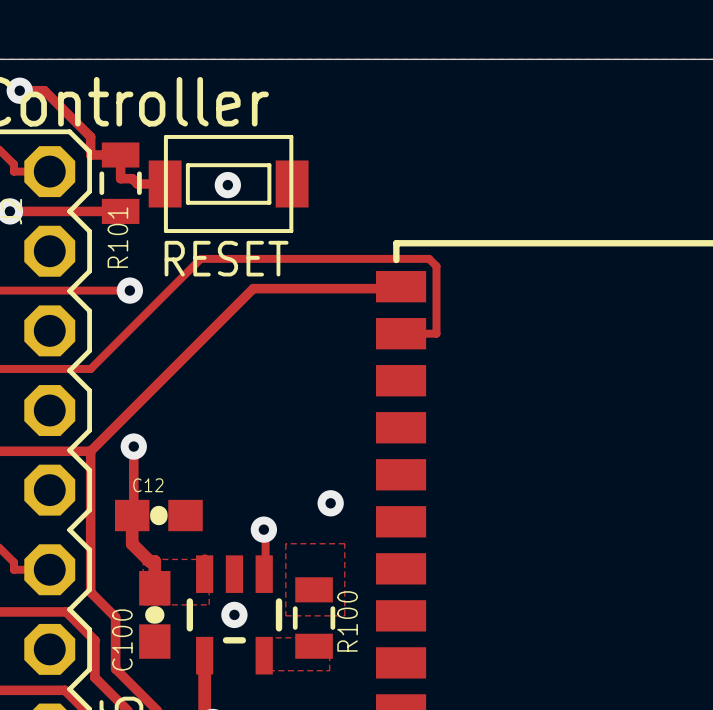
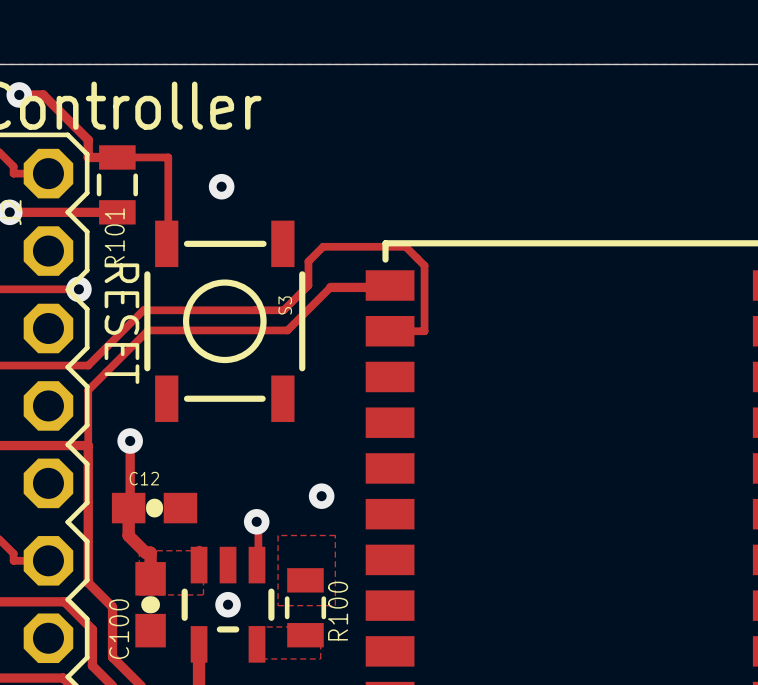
track: (120, 154) (120, 178) (132, 178) (137, 183) (165, 183) -> (117, 157) (168, 157) (168, 246) (166, 243)
part: (228, 183) -> none
text rotation: 0° (226, 258) -> 90° clockwise (121, 323)
track: (429, 258) (200, 258) (147, 312) -> (417, 258) (405, 246) (323, 246) (308, 261) (308, 285) (283, 310) (143, 310)
track: (339, 288) (253, 288) (90, 451) -> (330, 287) (287, 330) (148, 330) (88, 390) (88, 445)
track: (81, 290) (129, 290) -> none
via position: (129, 290) -> (78, 289)
S3: none -> (224, 321)

